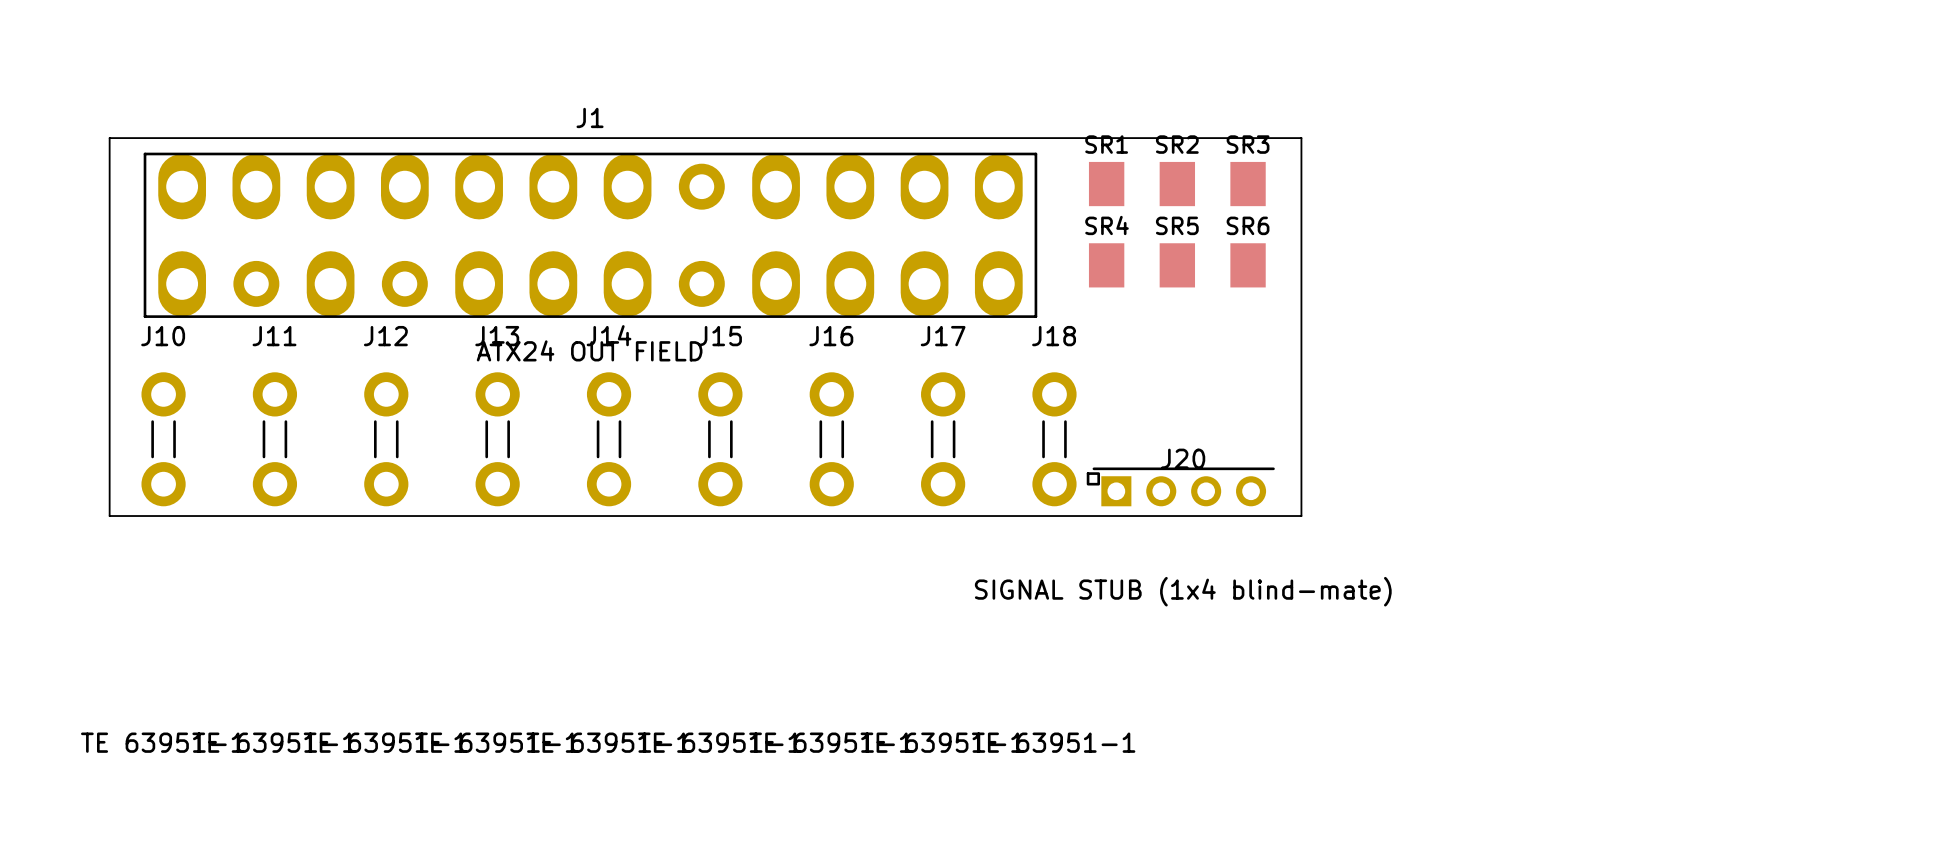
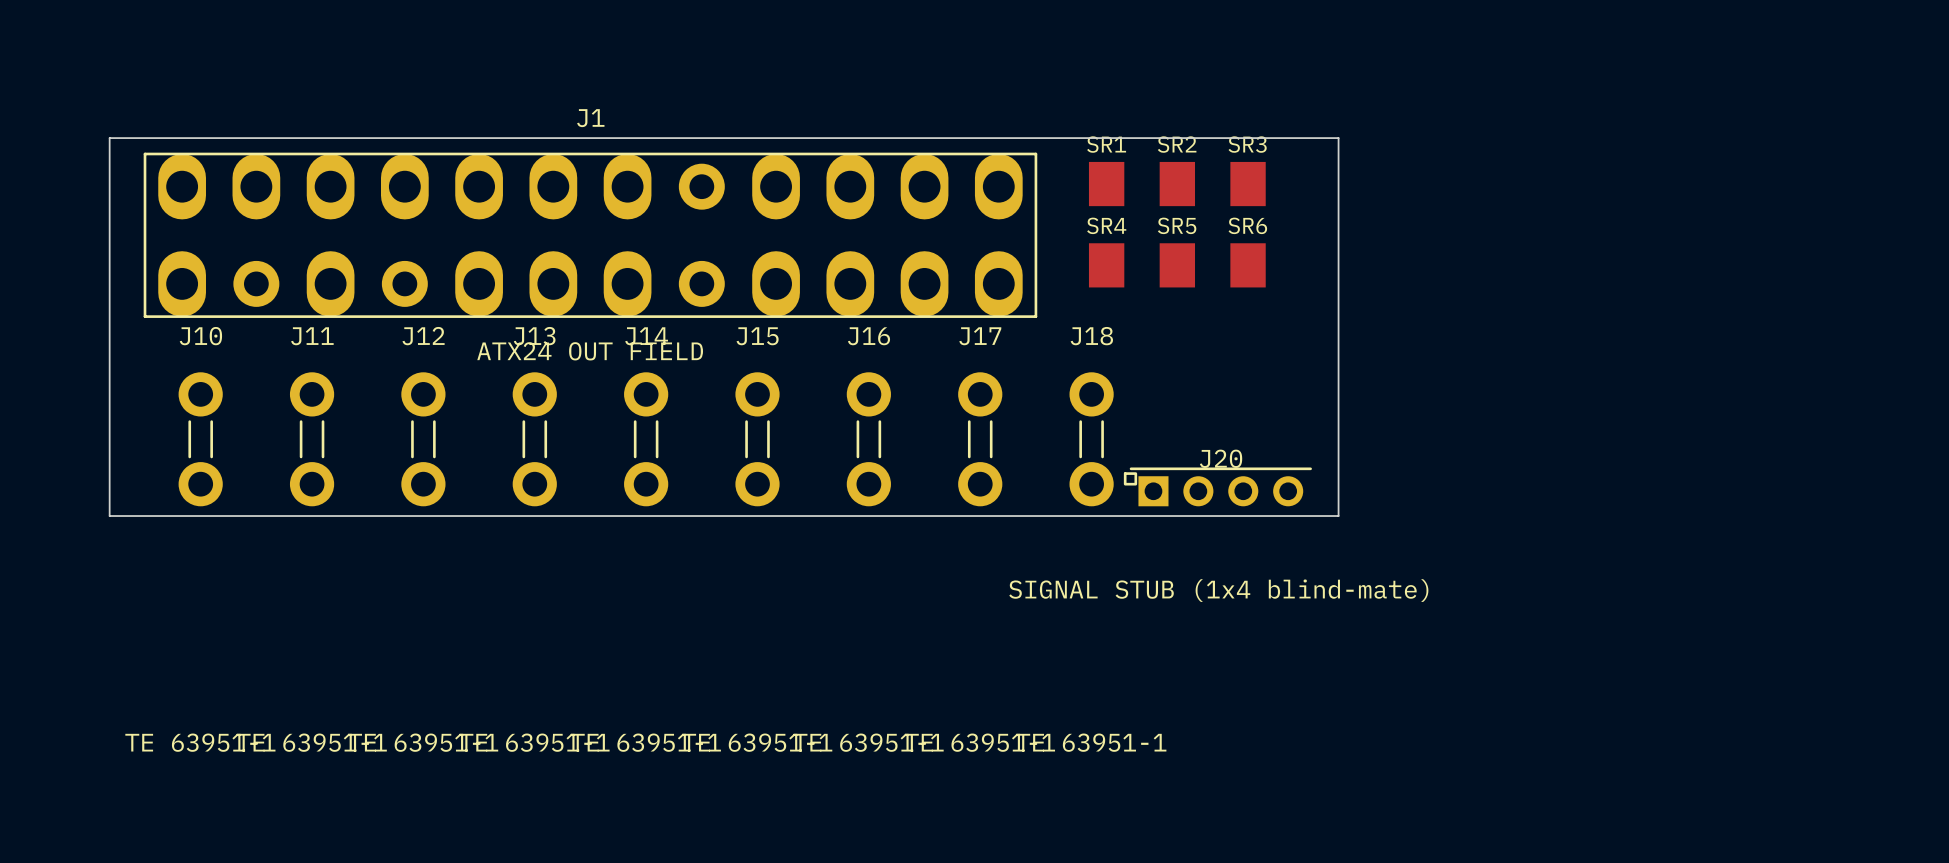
board edge: (1301, 138) (1301, 516) -> (1301, 138) (1338, 138) (1338, 516) (1301, 516)
J10 position: (163, 439) -> (200, 439)
J11 position: (274, 439) -> (312, 439)
J12 position: (386, 439) -> (423, 439)
J13 position: (497, 439) -> (534, 439)
J14 position: (609, 439) -> (646, 439)
J15 position: (720, 439) -> (757, 439)
J16 position: (831, 439) -> (868, 439)
J17 position: (943, 439) -> (980, 439)
J18 position: (1054, 439) -> (1091, 439)
J20 position: (1180, 486) -> (1217, 486)

